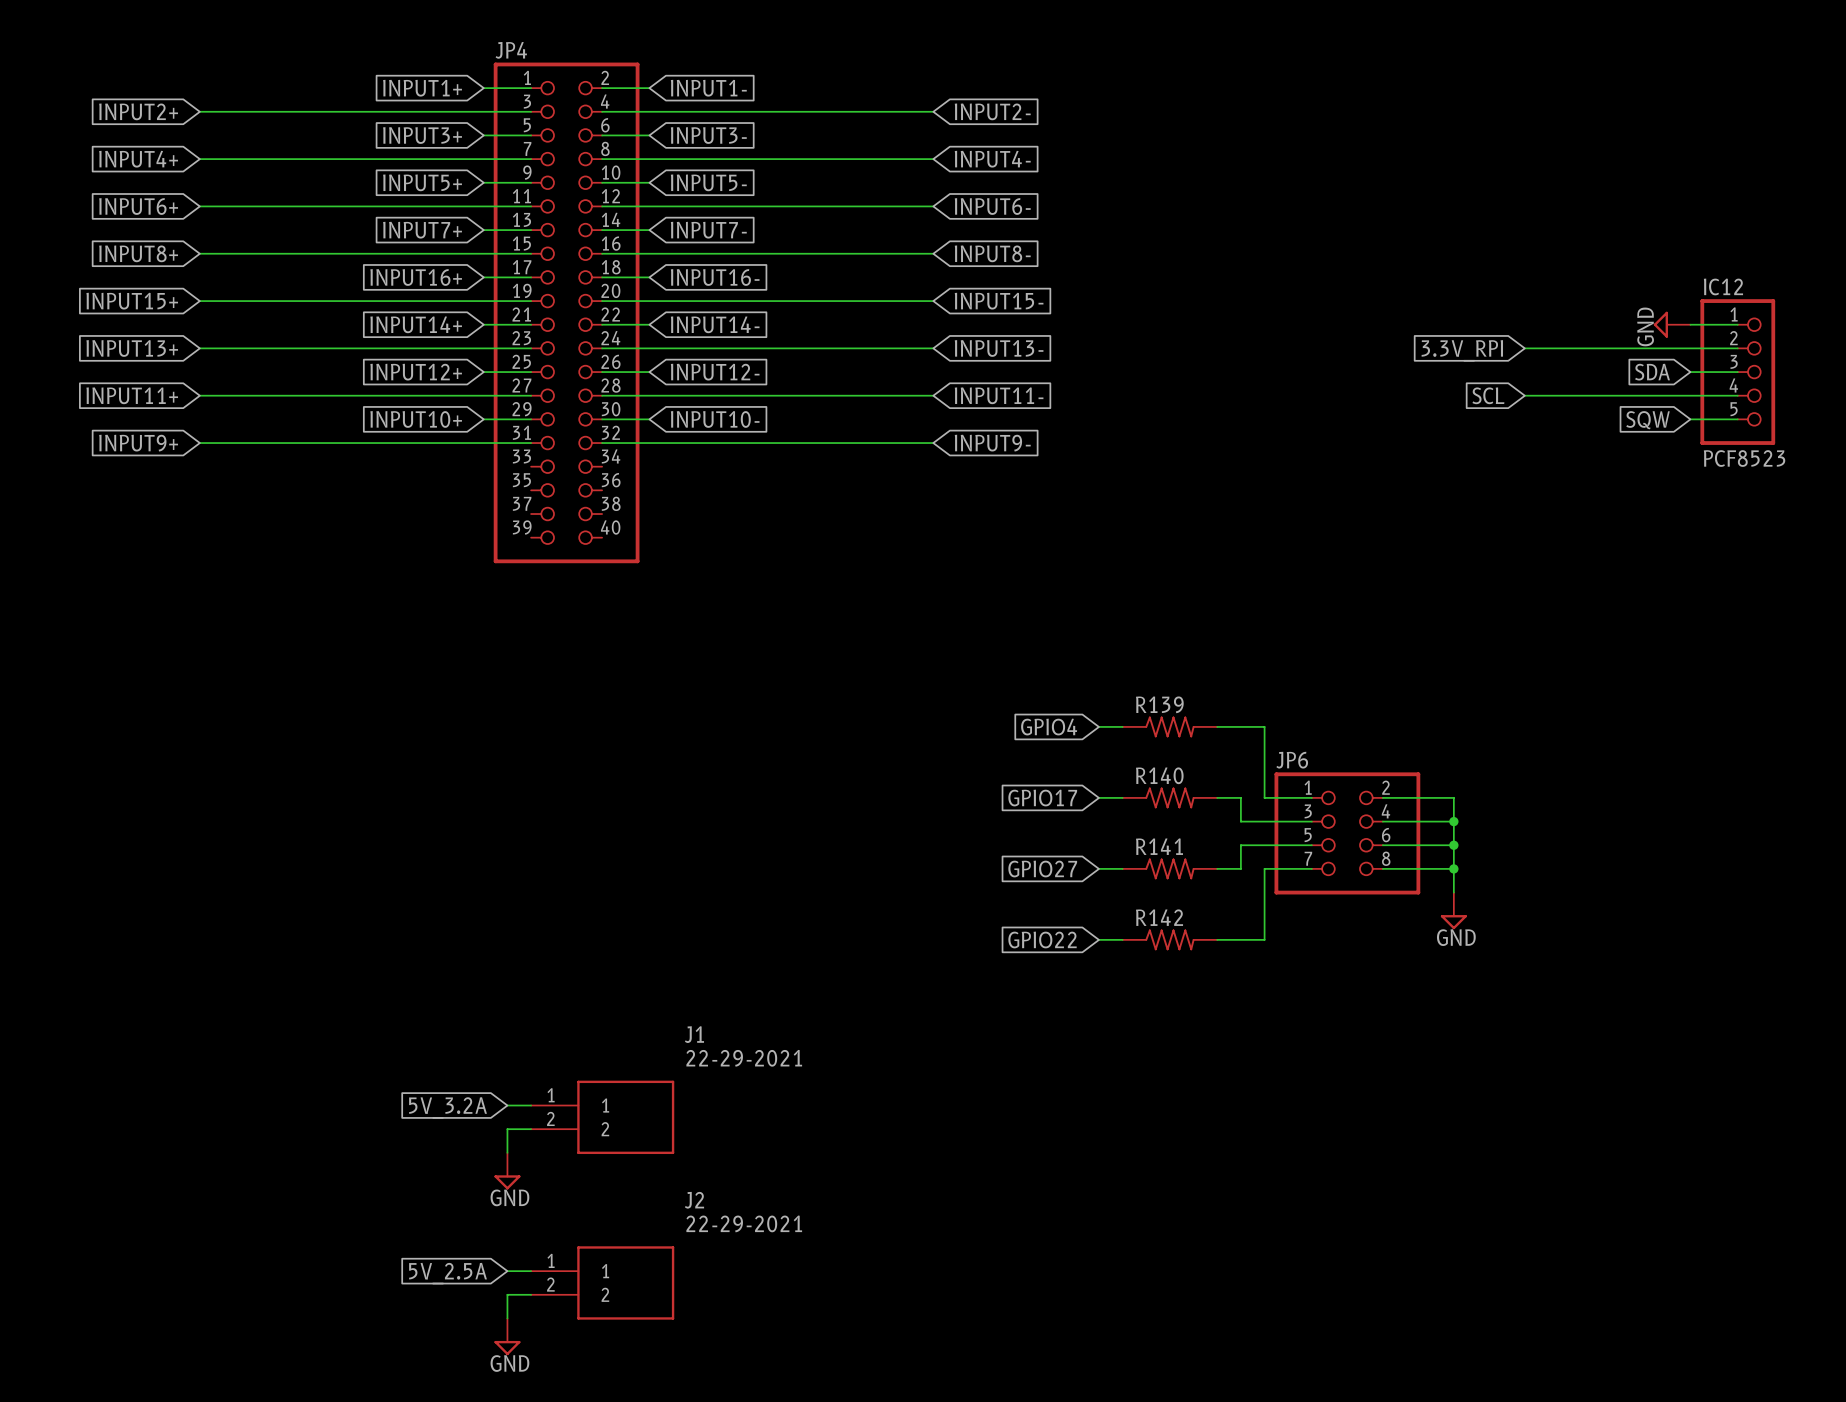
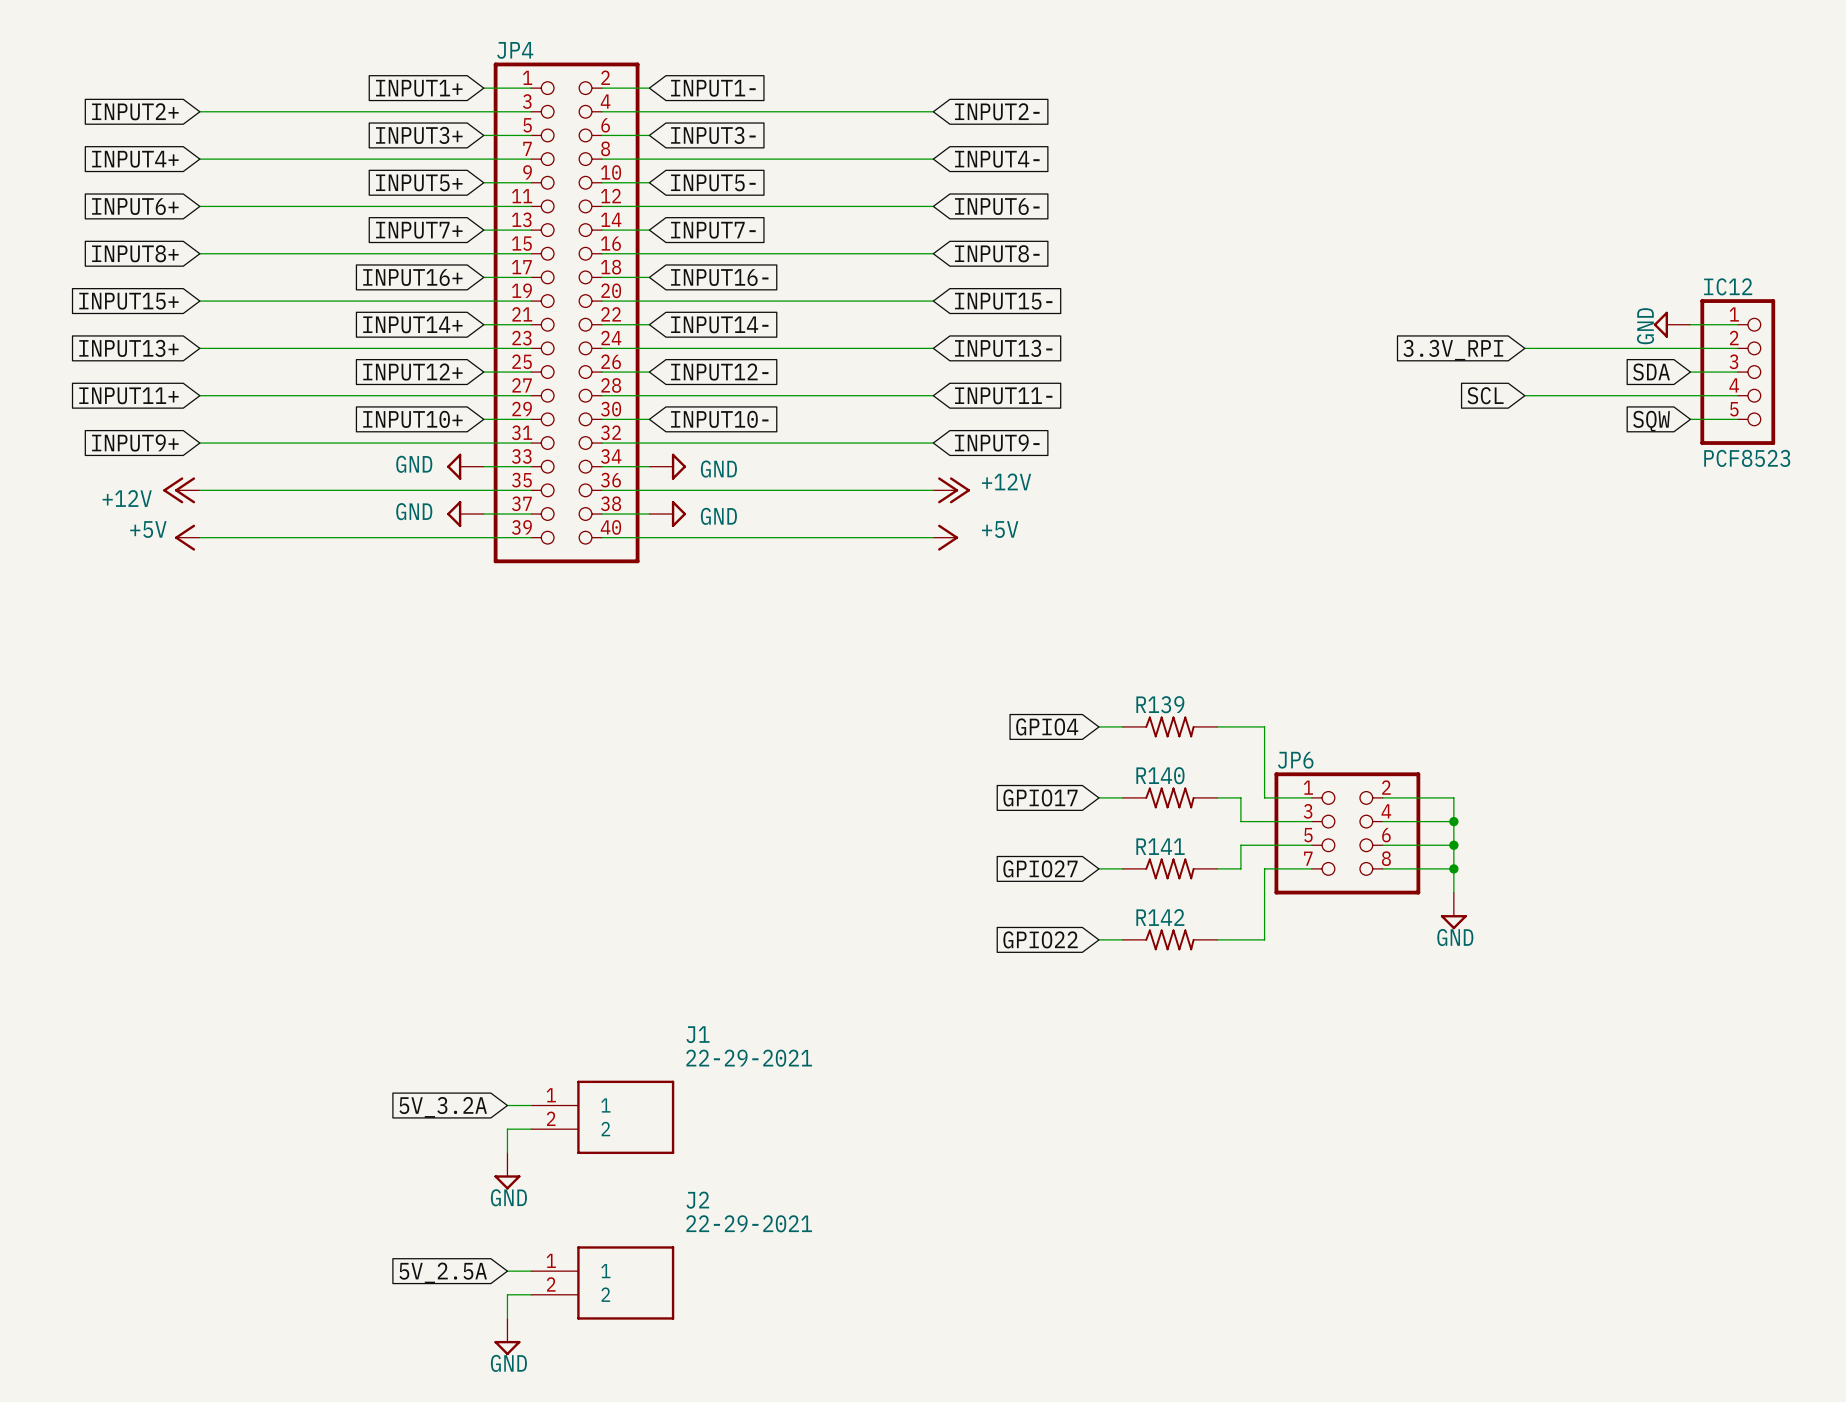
power symbol: none -> GND (465, 466)
wire: none -> (483, 466) (531, 466)
wire: none -> (602, 466) (649, 466)
power symbol: none -> GND (667, 466)
power symbol: none -> +12V (181, 490)
wire: none -> (199, 490) (531, 490)
wire: none -> (602, 490) (933, 490)
power symbol: none -> +12V (951, 490)
power symbol: none -> GND (465, 514)
wire: none -> (483, 514) (531, 514)
wire: none -> (602, 514) (649, 514)
power symbol: none -> GND (667, 514)
power symbol: none -> +5V (187, 537)
wire: none -> (199, 537) (531, 537)
wire: none -> (602, 537) (933, 537)
power symbol: none -> +5V (945, 537)

